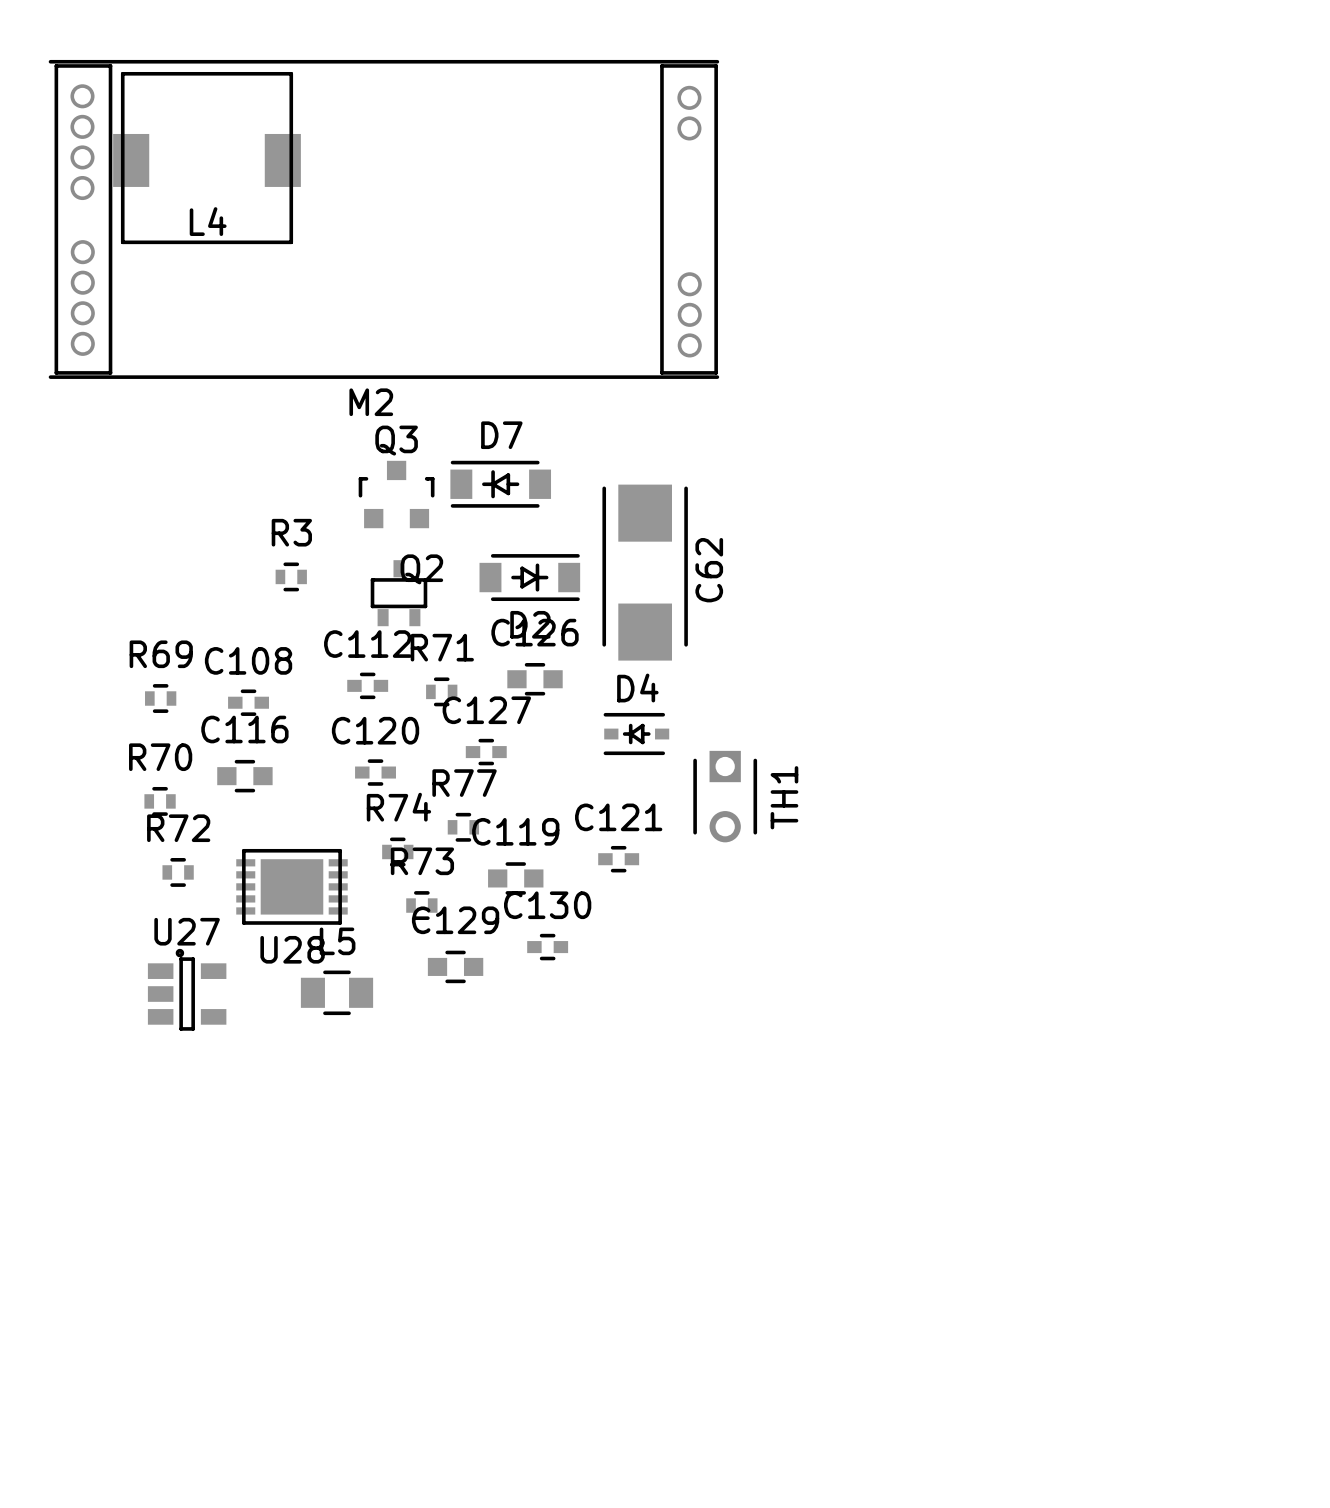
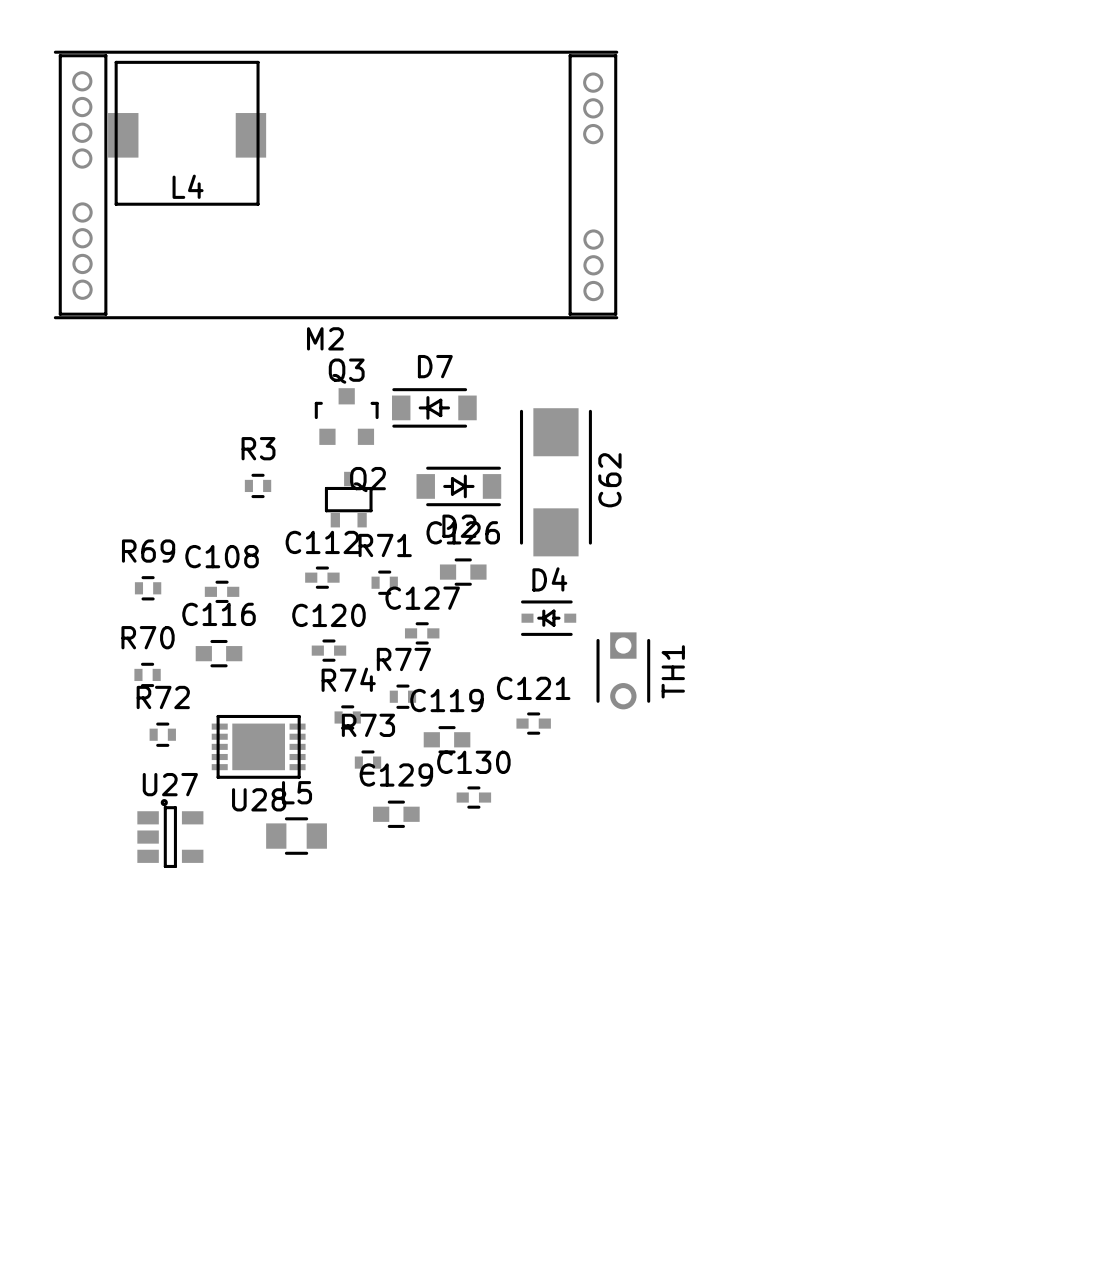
M2 footprint: [48, 59, 720, 379] -> [53, 50, 619, 320]

